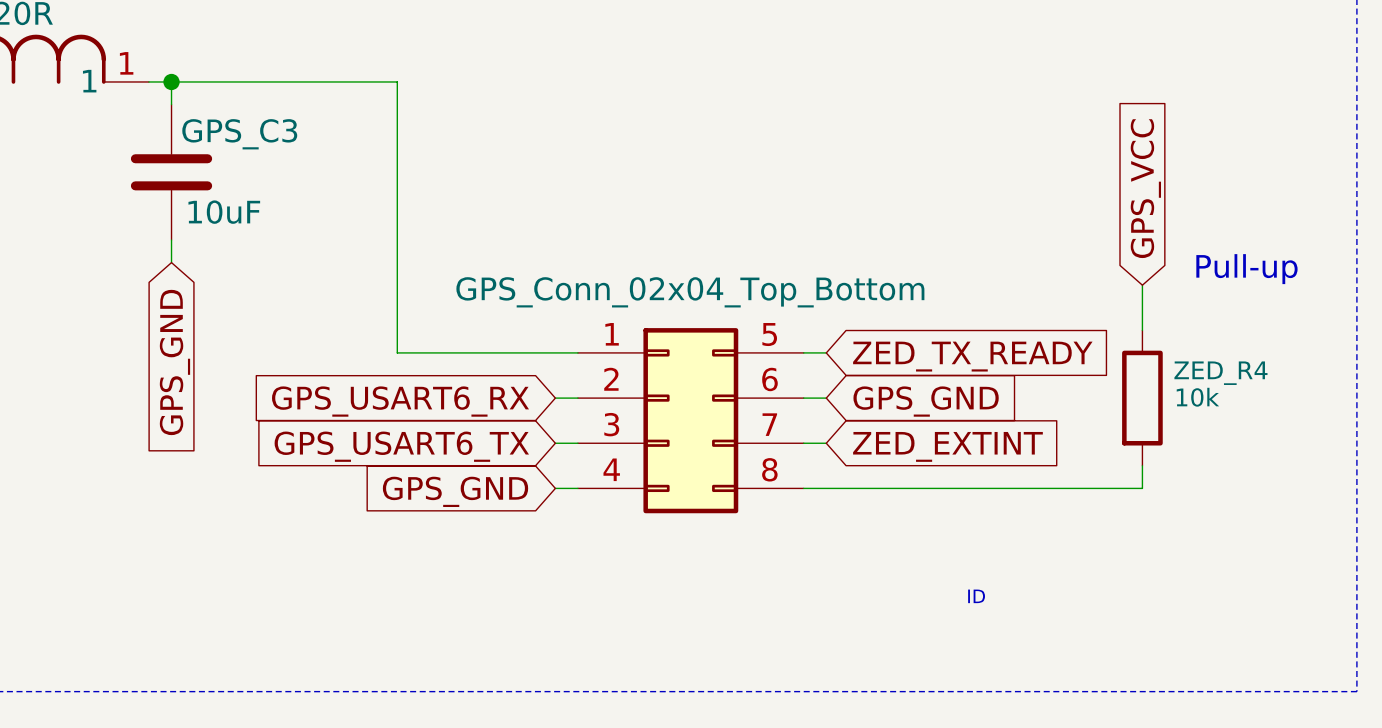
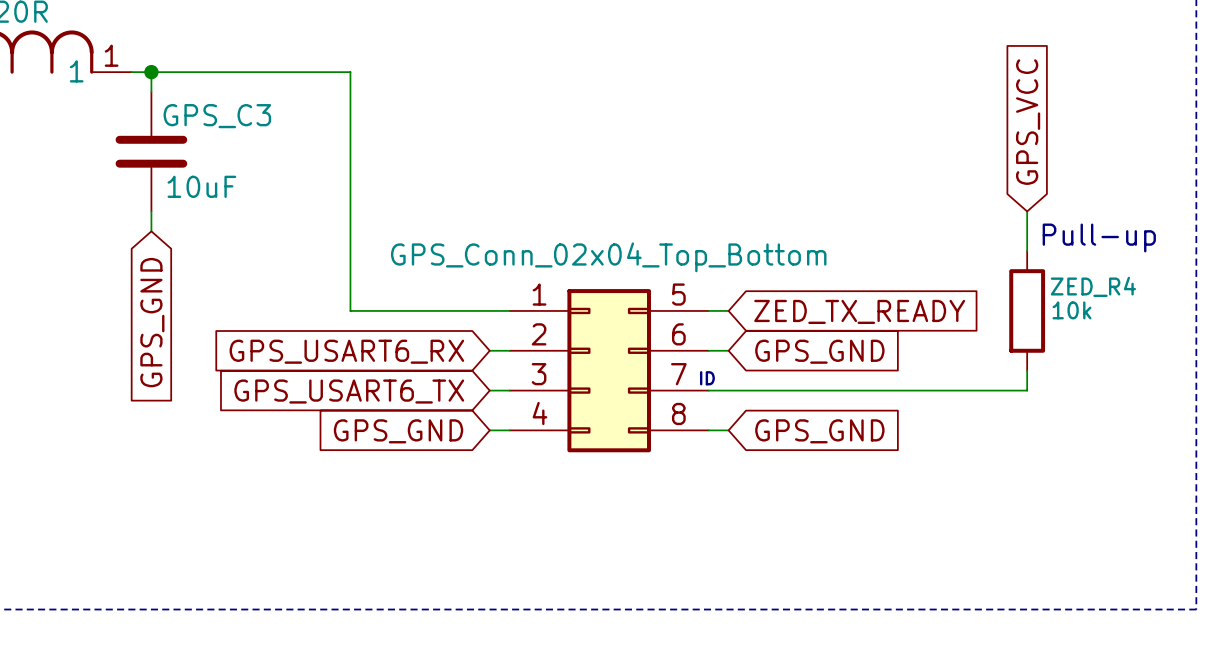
global label position: GPS_VCC (1145, 188) -> GPS_VCC (1028, 122)
wire: (1142, 285) (1142, 330) -> (1027, 211) (1027, 251)
ZED_R4 position: (1142, 398) -> (1027, 310)
wire: none -> (1027, 370) (1027, 390) (728, 390)
global label: ZED_EXTINT (947, 446) -> none
wire: (1142, 465) (1142, 488) (826, 488) -> none
global label: none -> GPS_GND (819, 431)
text position: ID (976, 596) -> ID (707, 378)

